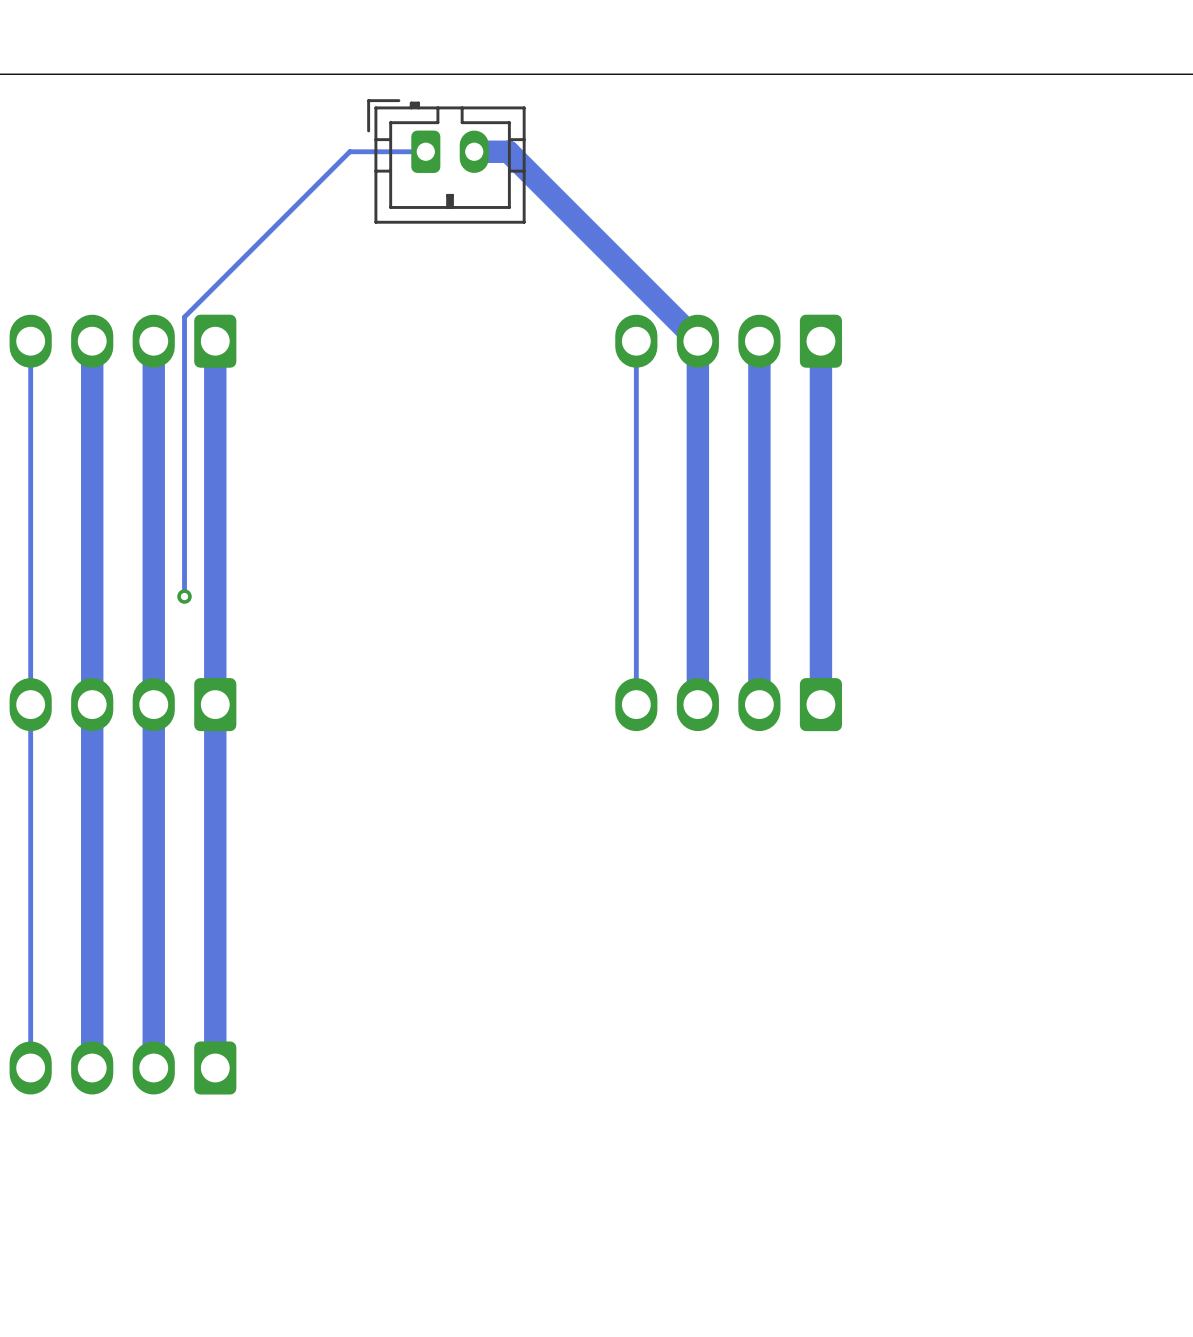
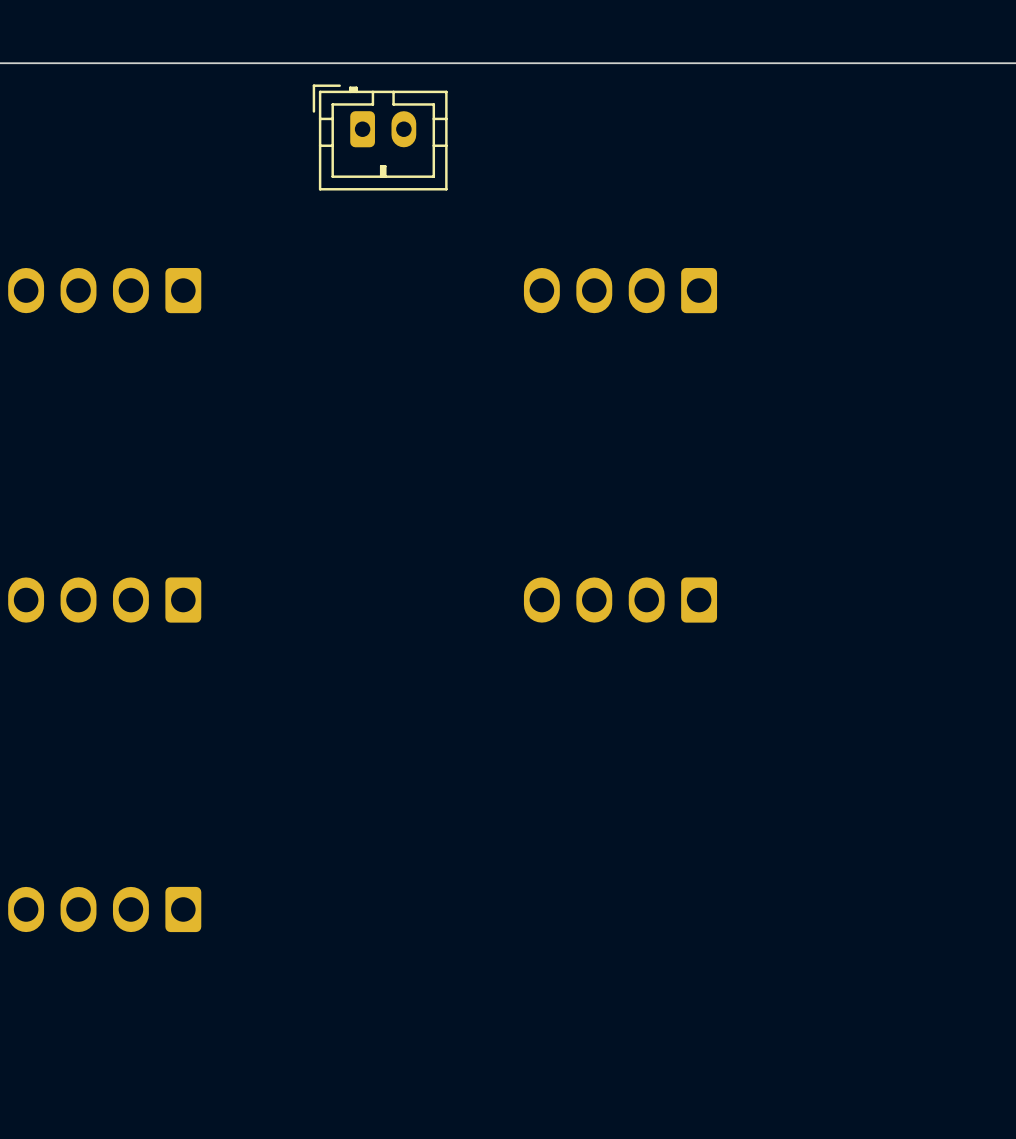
track: (425, 151) (349, 151) (184, 317) (184, 596) -> none
track: (474, 151) (508, 151) (697, 341) (697, 704) -> none
track: (30, 341) (30, 1067) -> none
track: (92, 341) (92, 1067) -> none
track: (153, 341) (153, 1067) -> none
track: (215, 341) (215, 1067) -> none
track: (636, 341) (636, 704) -> none
track: (759, 341) (759, 704) -> none
track: (820, 341) (820, 704) -> none
via: (184, 596) -> none

